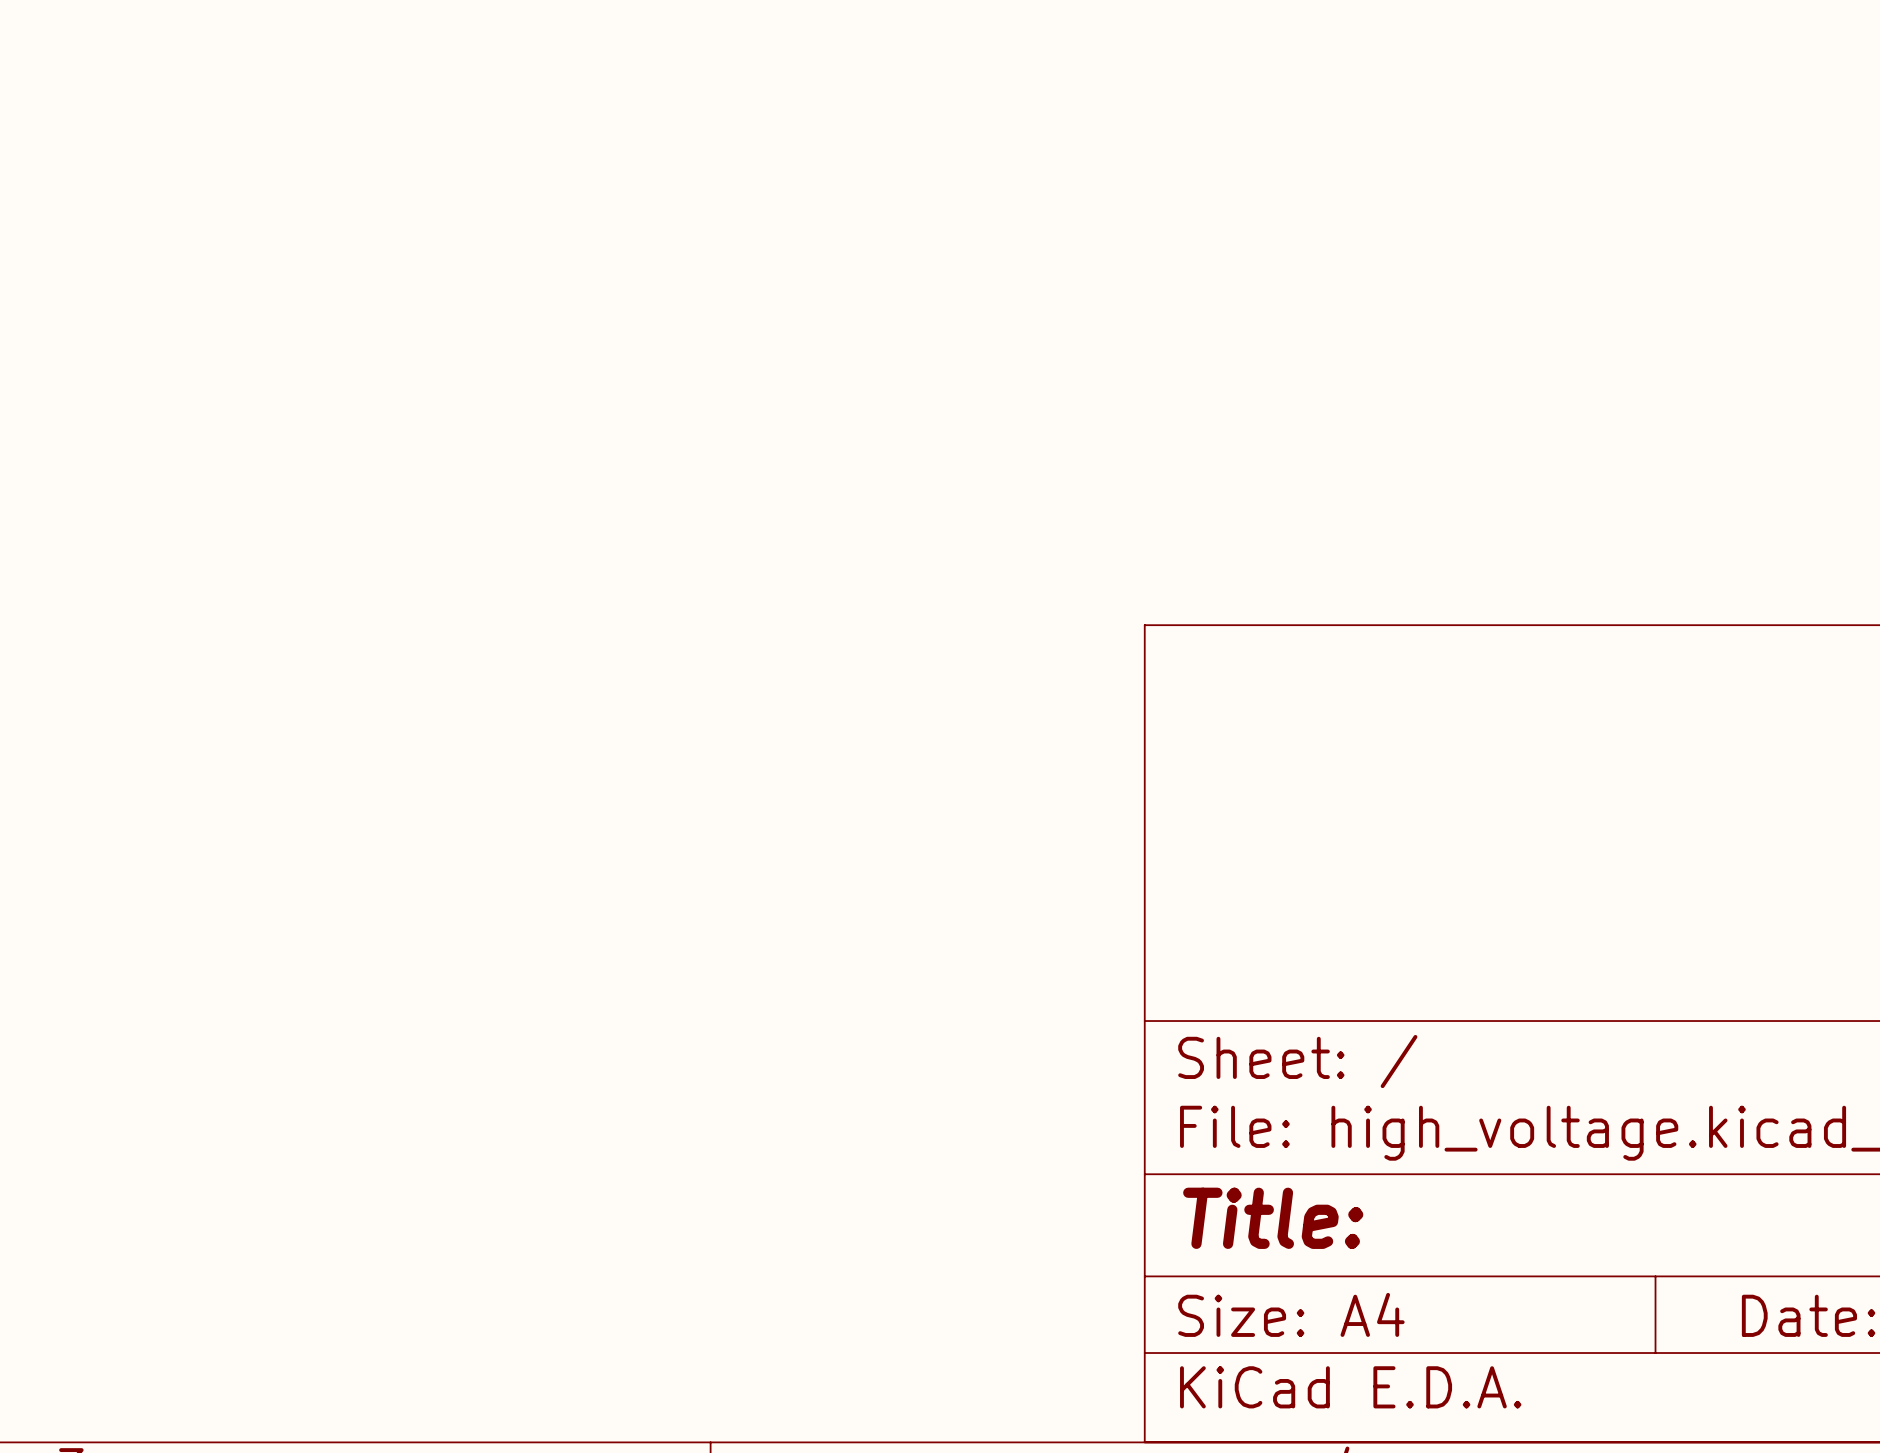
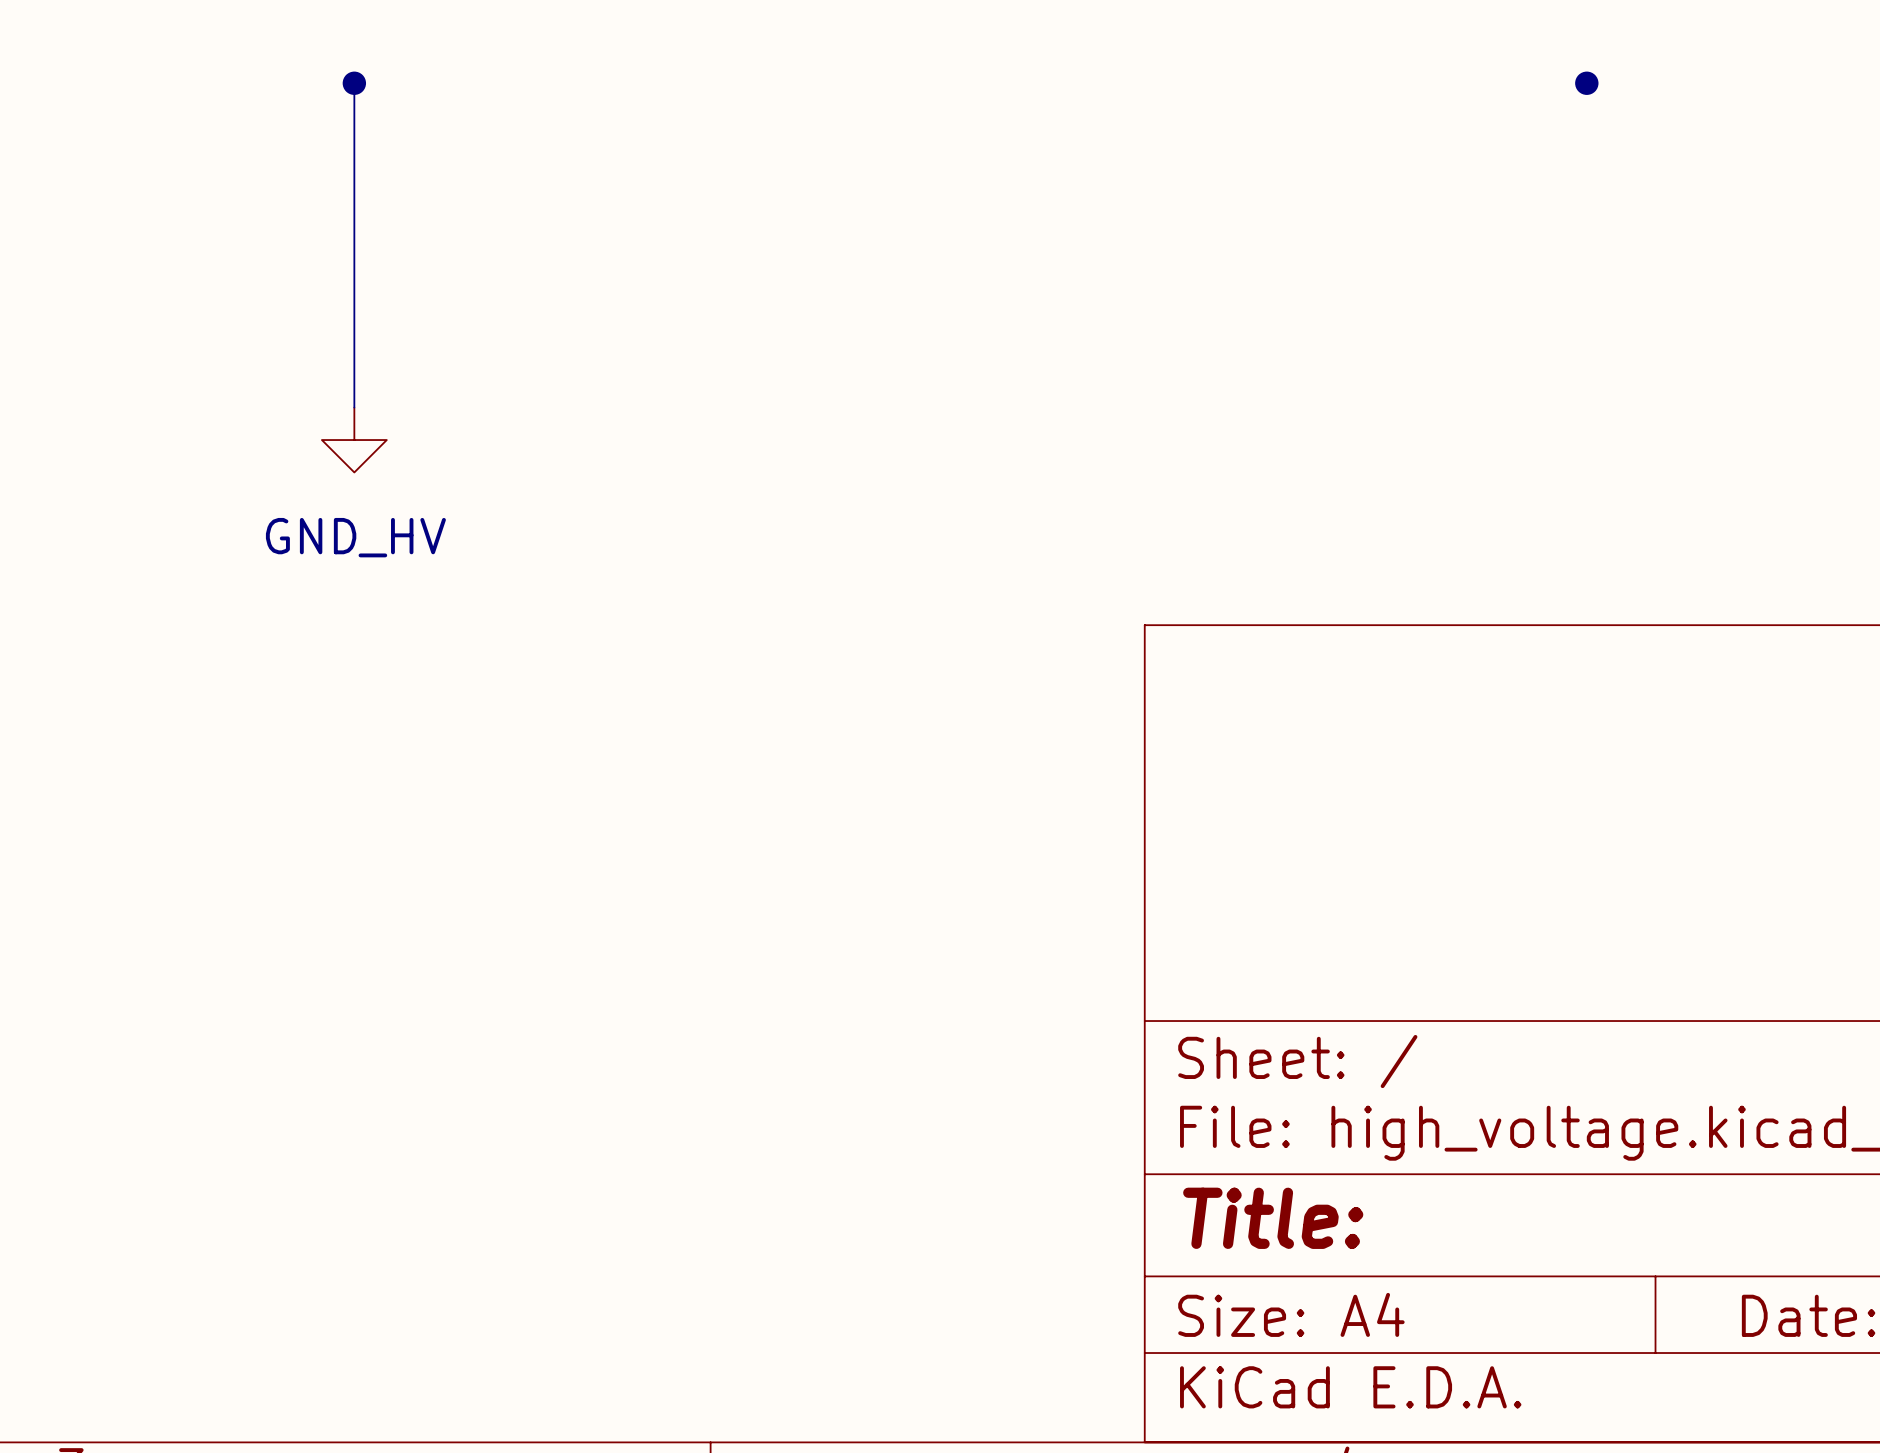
wire: none -> (354, 83) (354, 407)
junction: none -> (354, 83)
junction: none -> (1586, 83)
power symbol: none -> GND_HV (354, 440)

